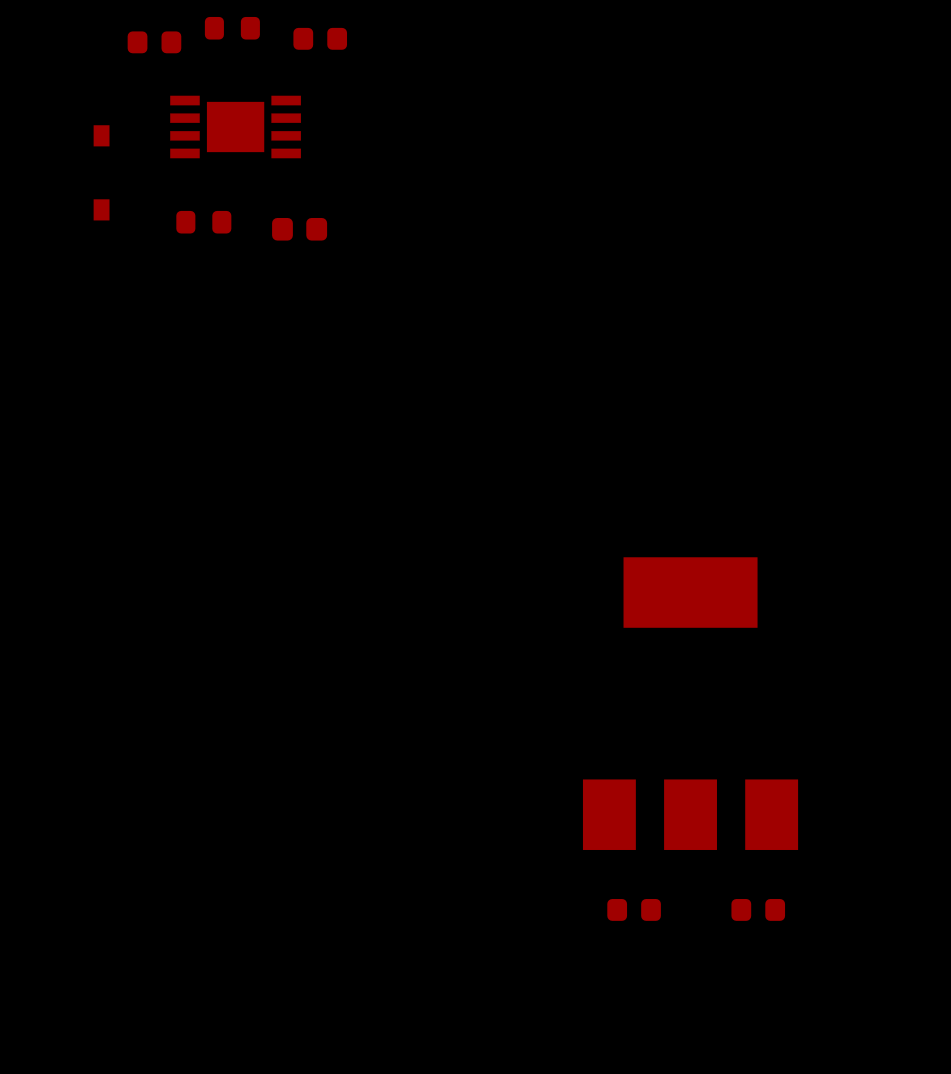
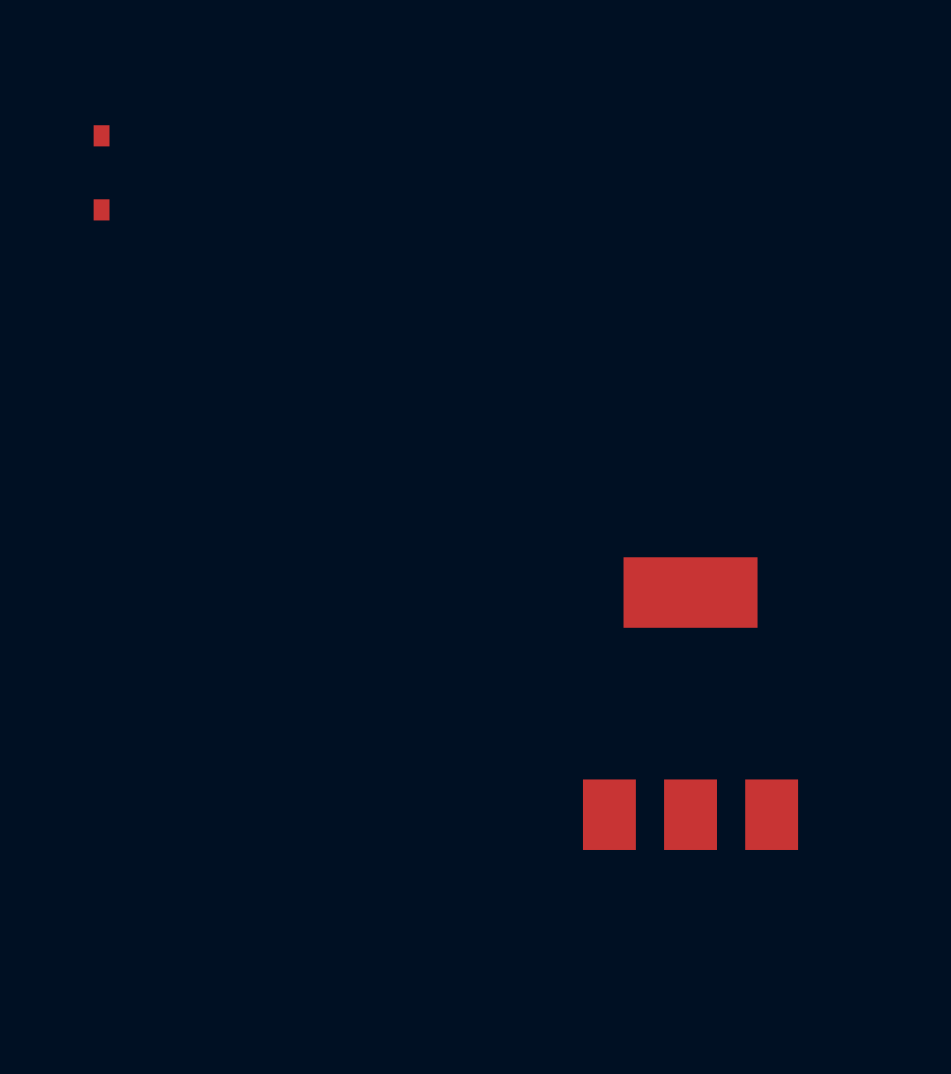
part: (232, 28) -> none
part: (320, 38) -> none
part: (154, 42) -> none
part: (235, 127) -> none
part: (203, 222) -> none
part: (299, 229) -> none
part: (634, 909) -> none
part: (758, 909) -> none

